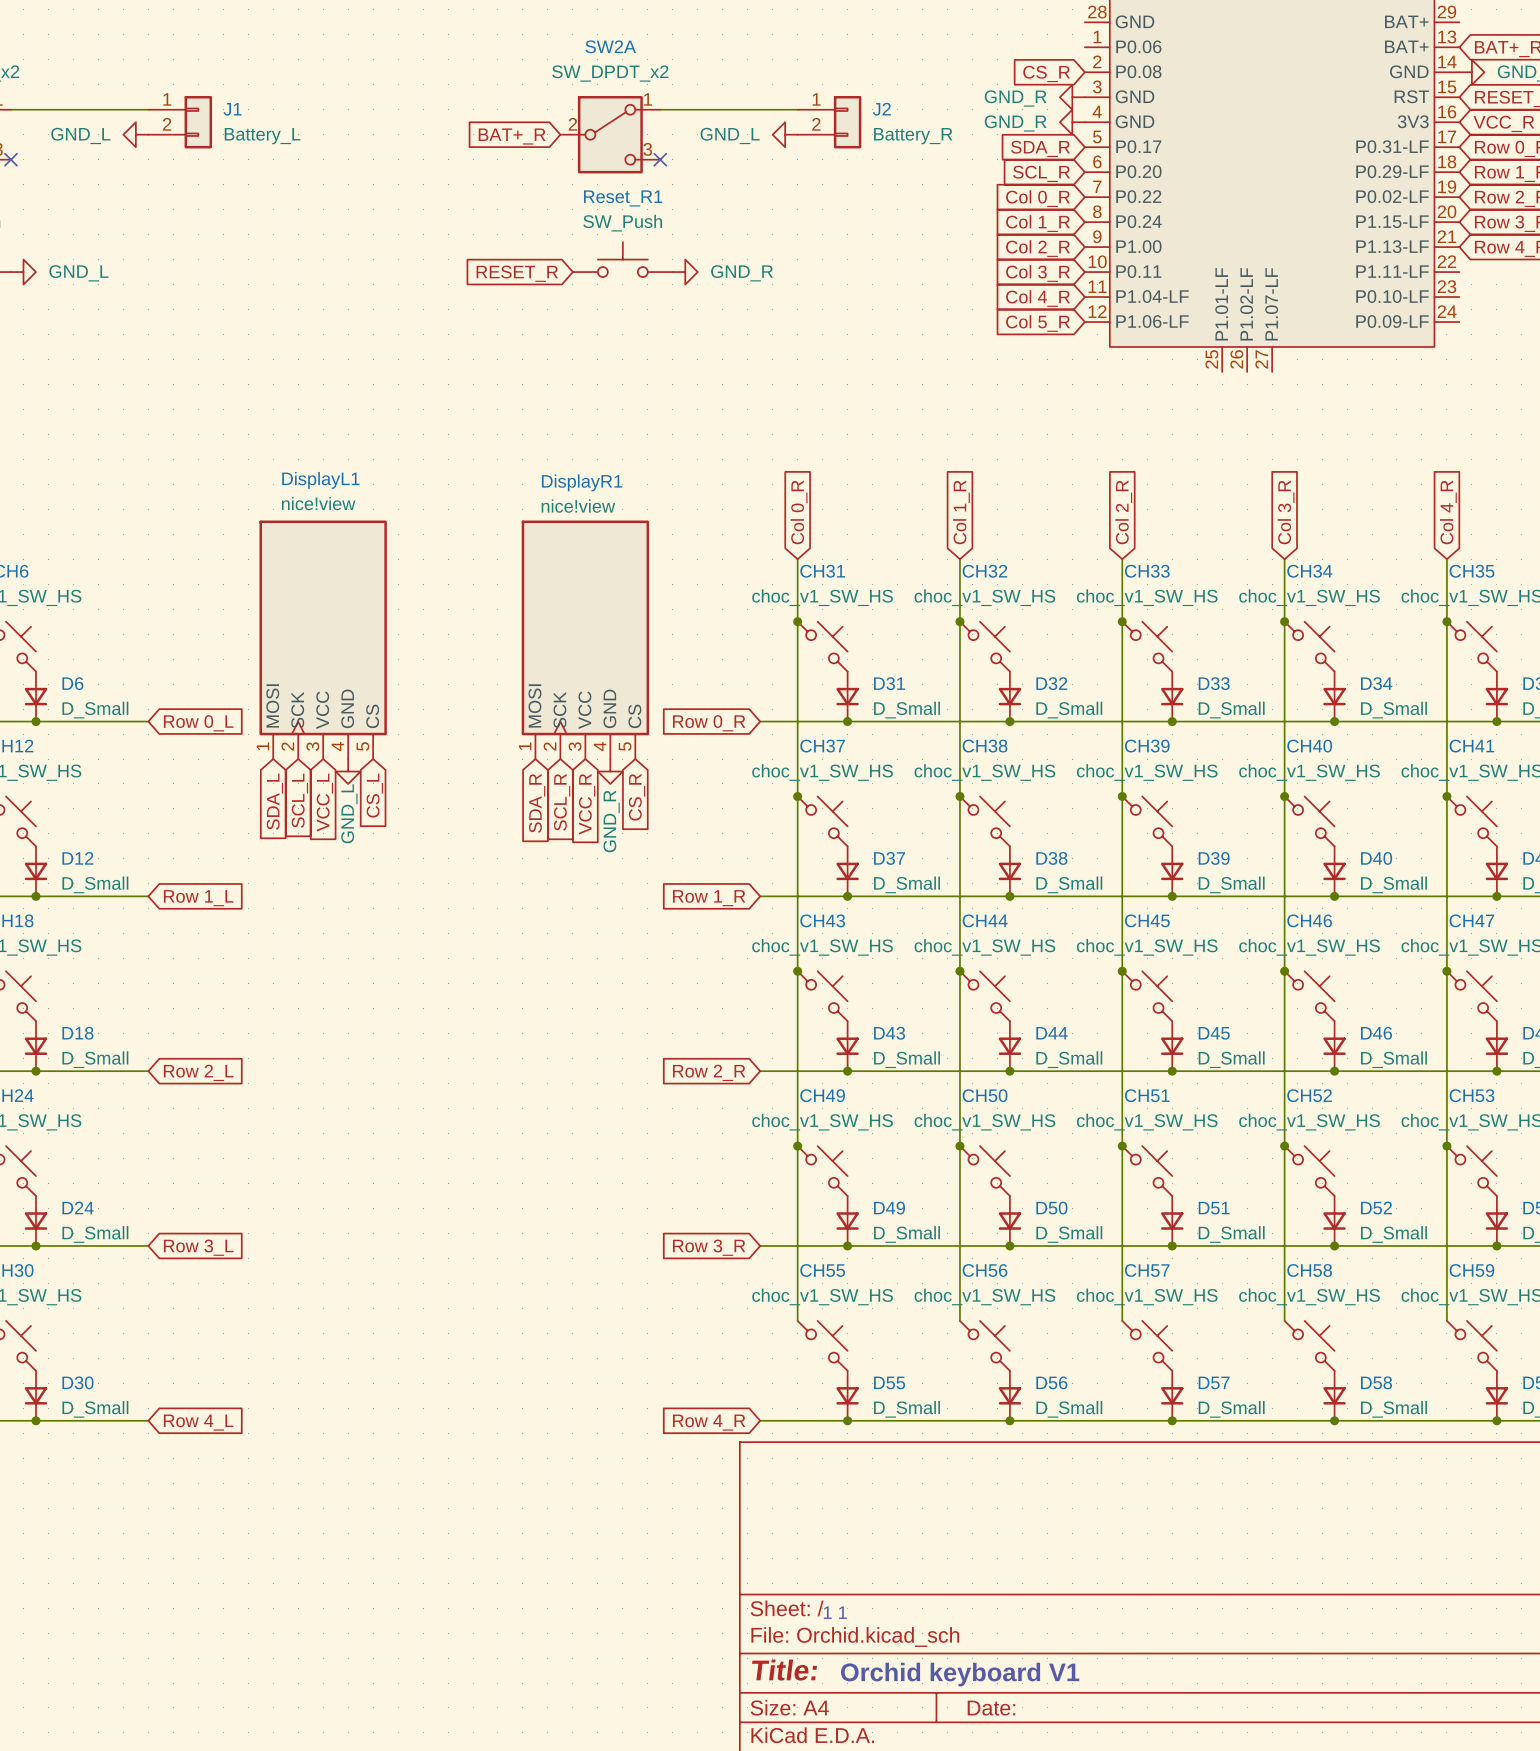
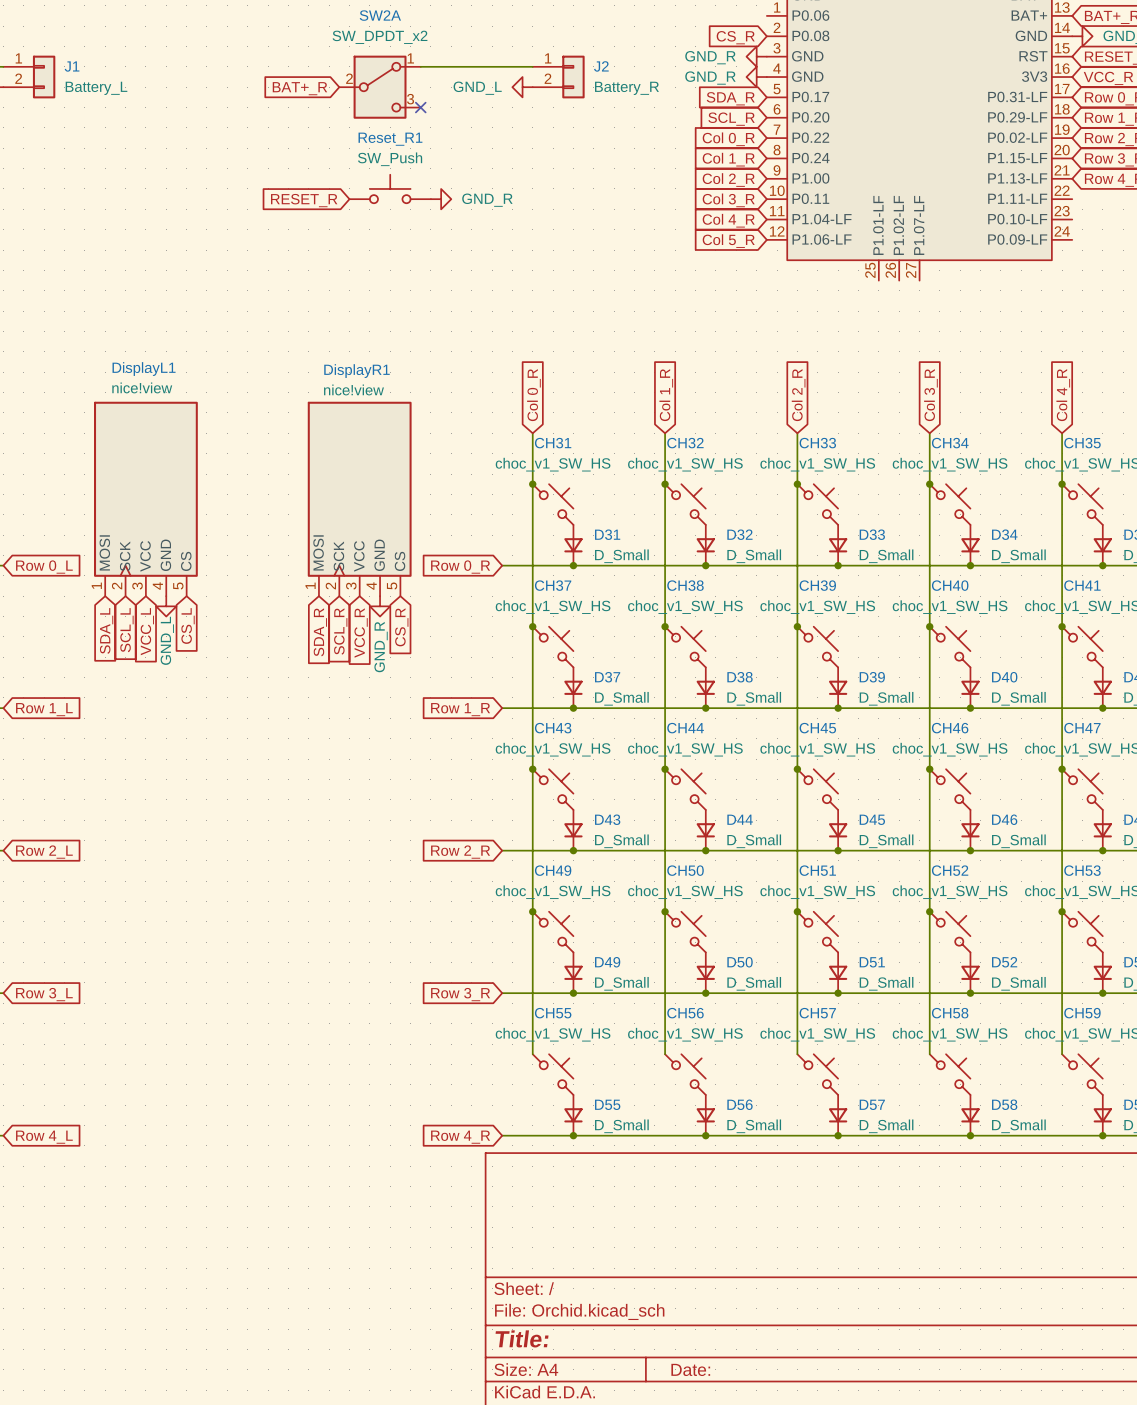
text: 1 1 (835, 1612) -> none
text: Orchid keyboard V1 (960, 1674) -> none

